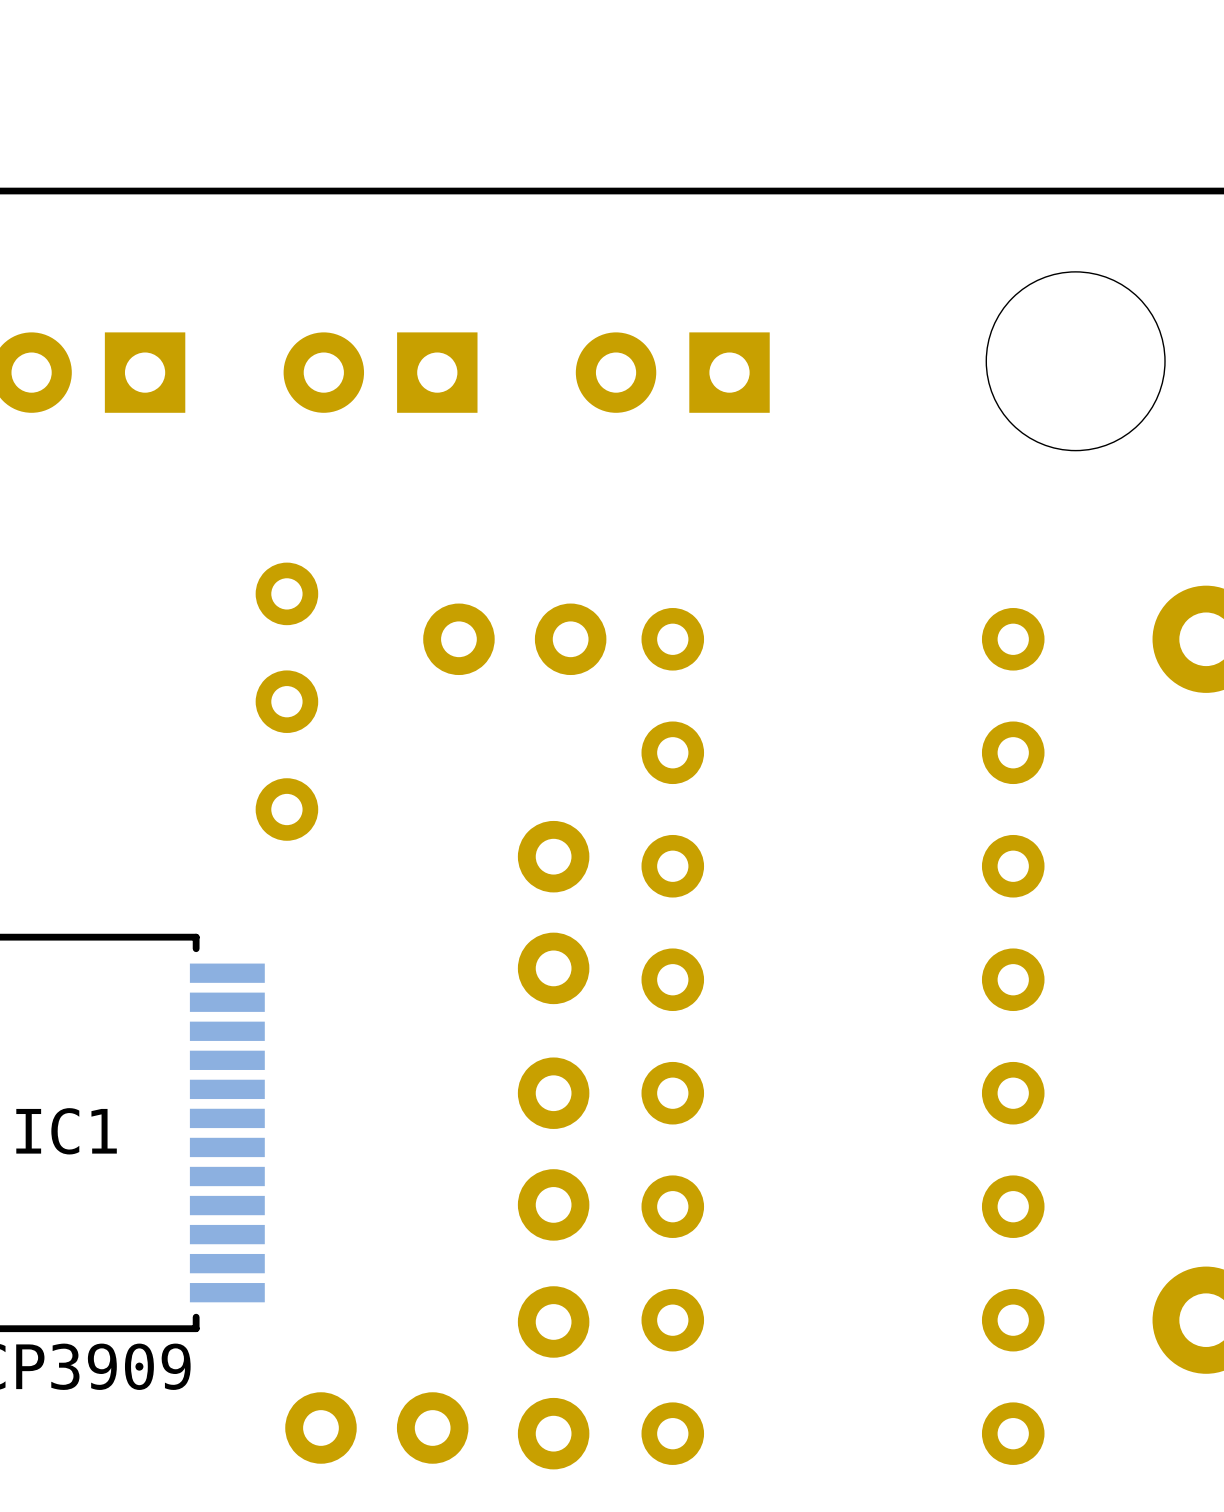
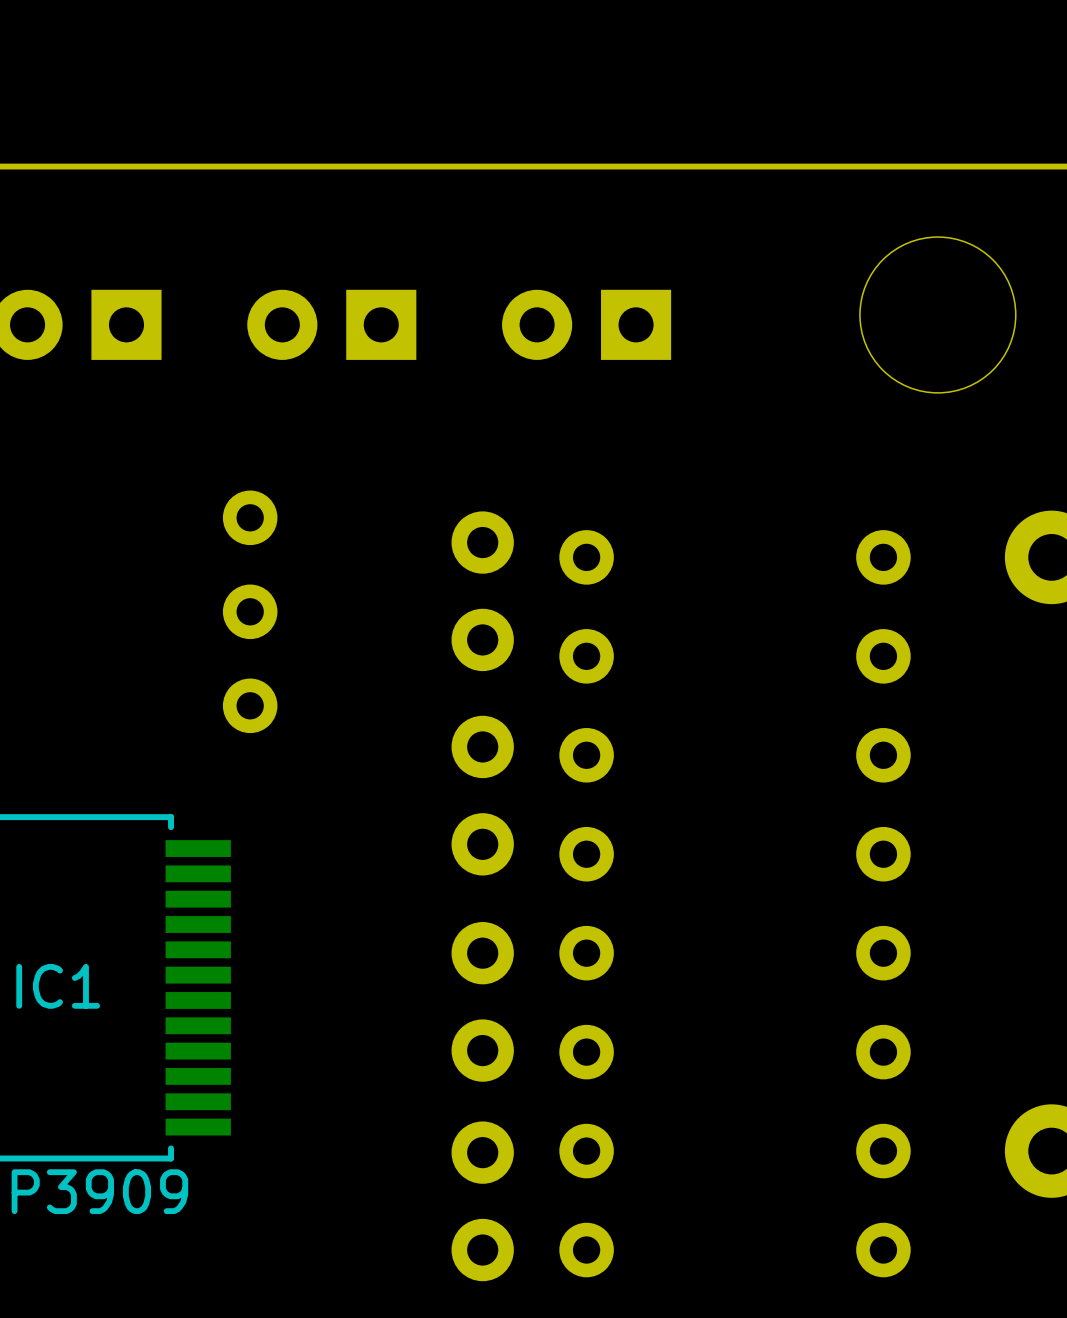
part rotation: 0° (514, 639) -> 90° clockwise (482, 591)
part: (376, 1427) -> none

